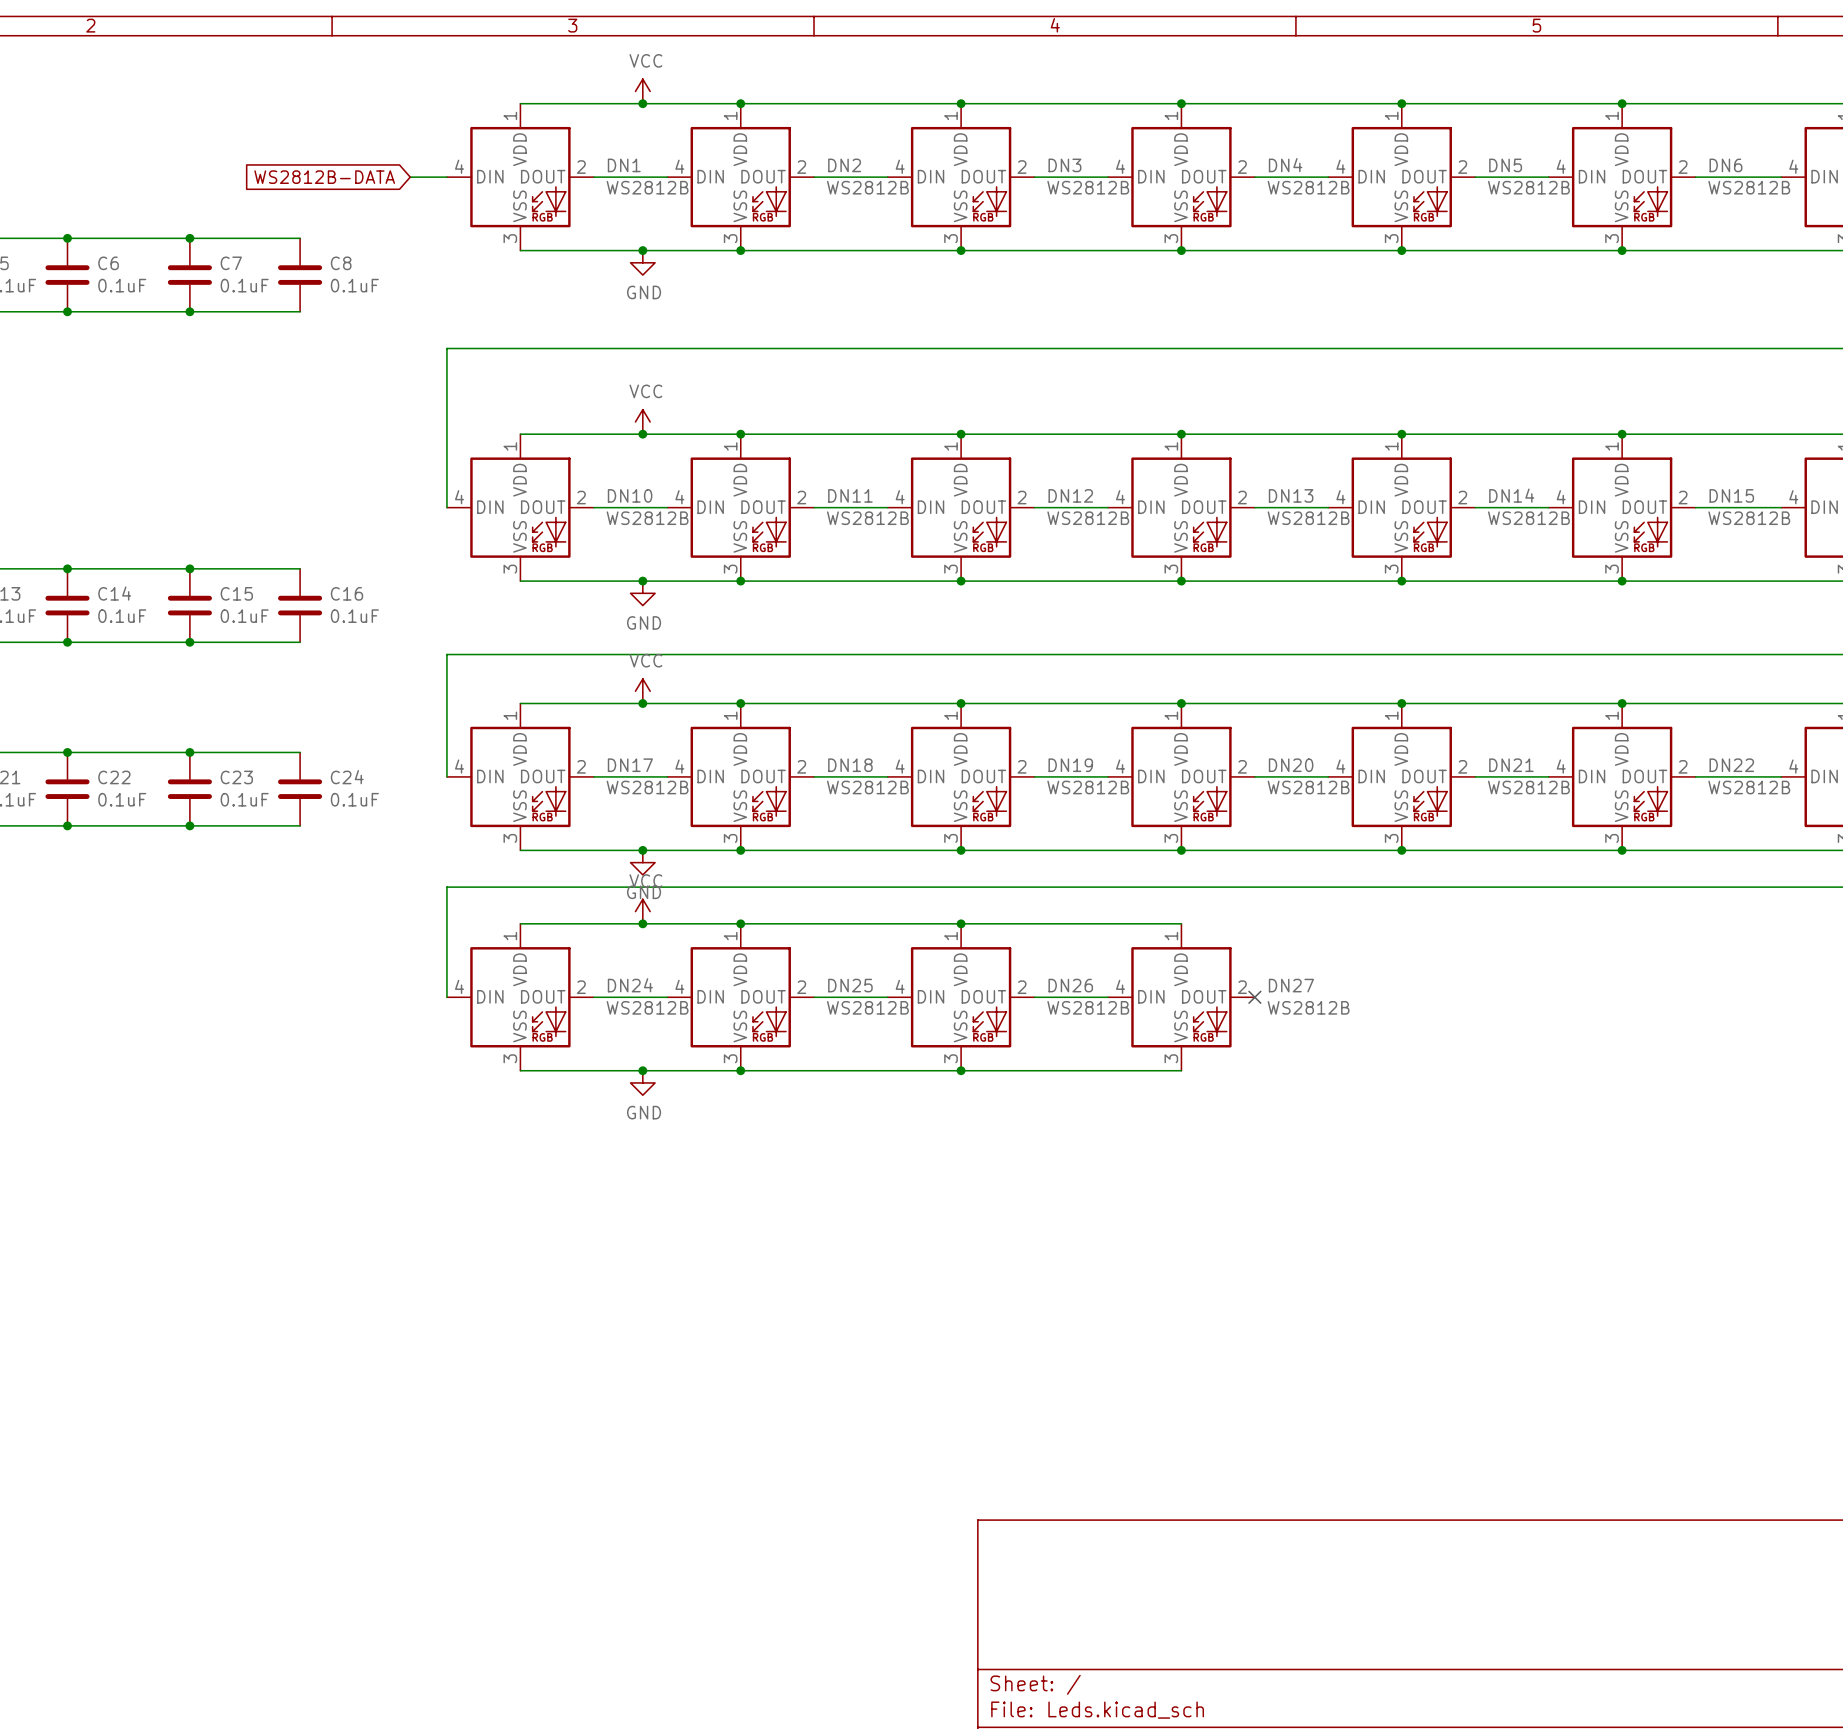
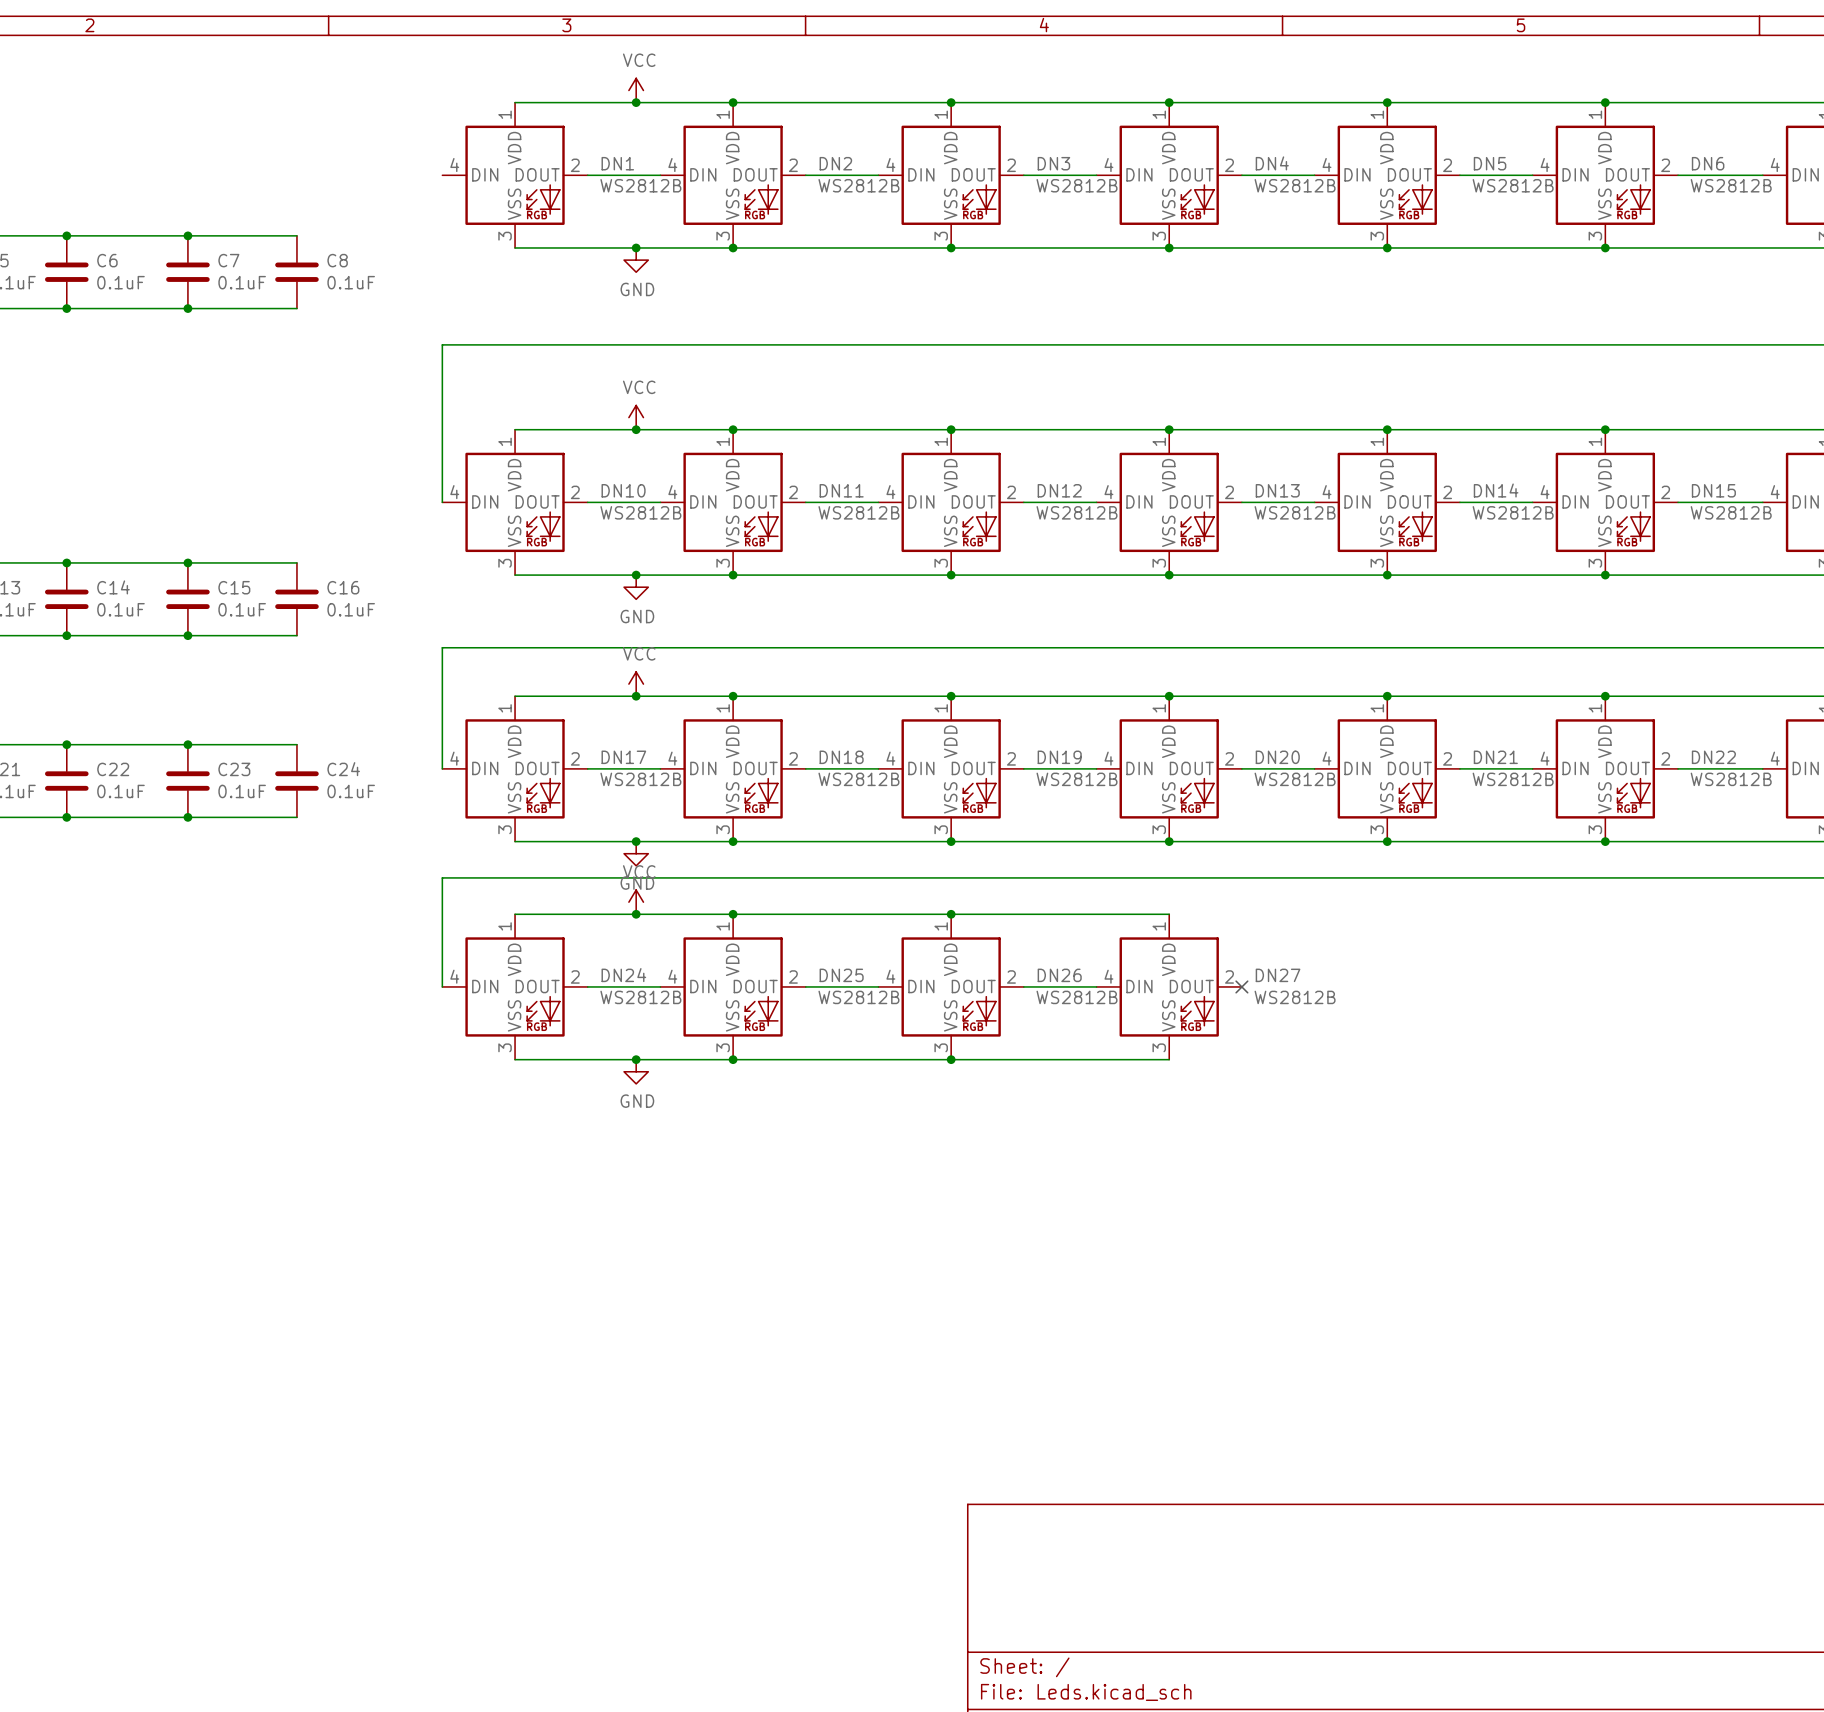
global label: WS2812B-DATA (324, 177) -> none
wire: (410, 177) (446, 177) -> none

